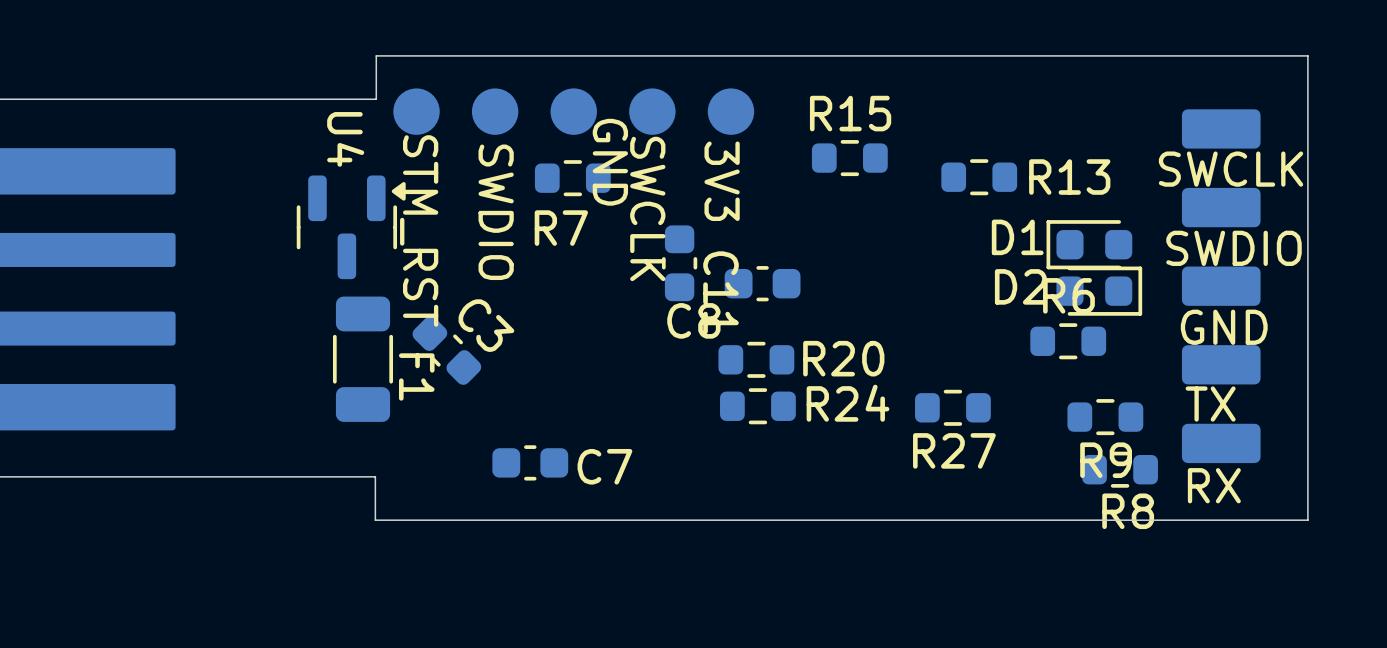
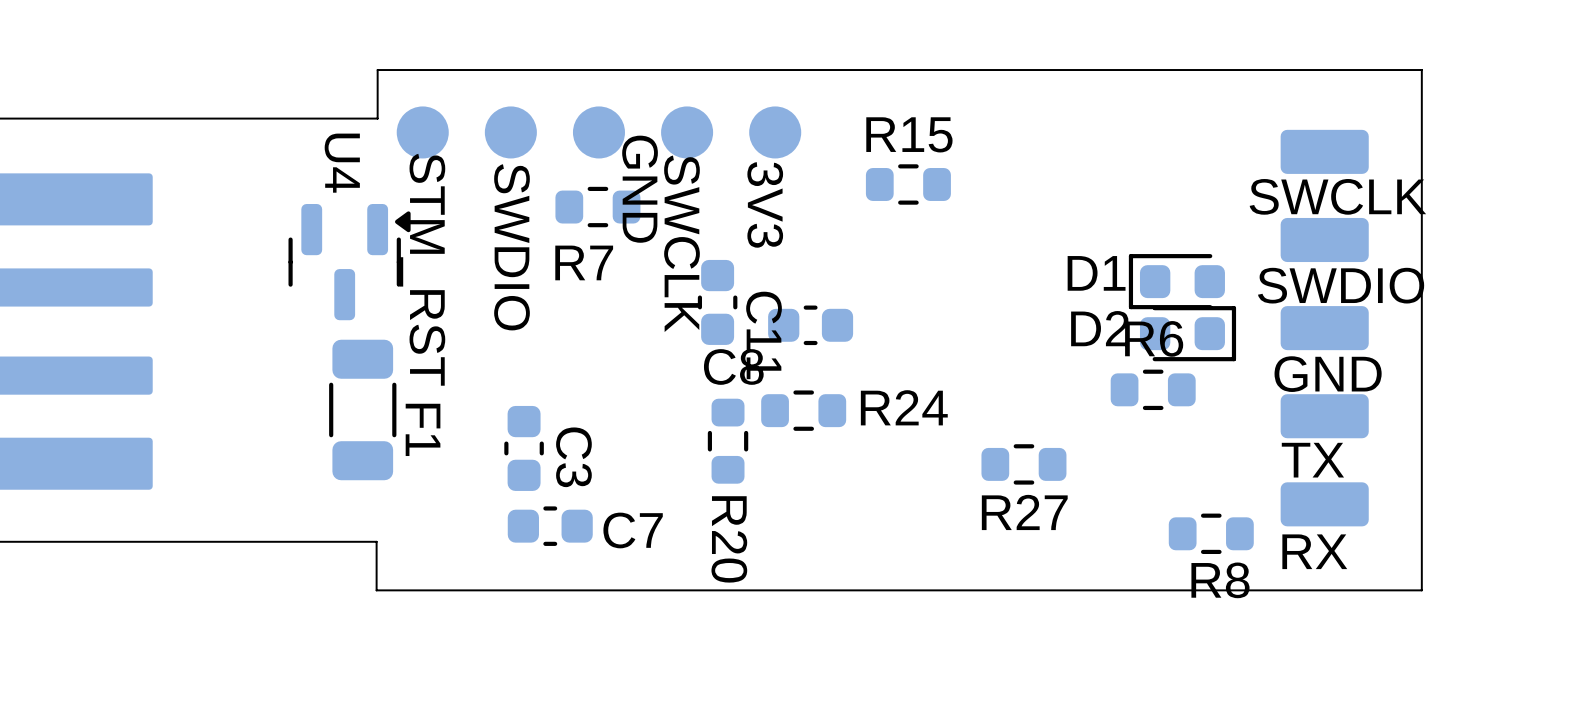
R13: (979, 177) -> none
C3 rotation: 0° (446, 350) -> 45° clockwise (524, 448)
C3 position: (446, 350) -> (524, 448)
R20 name: R20 (843, 358) -> R24 (904, 407)
R20: none -> (728, 441)
R24: (757, 406) -> none
R9: (1105, 417) -> none

